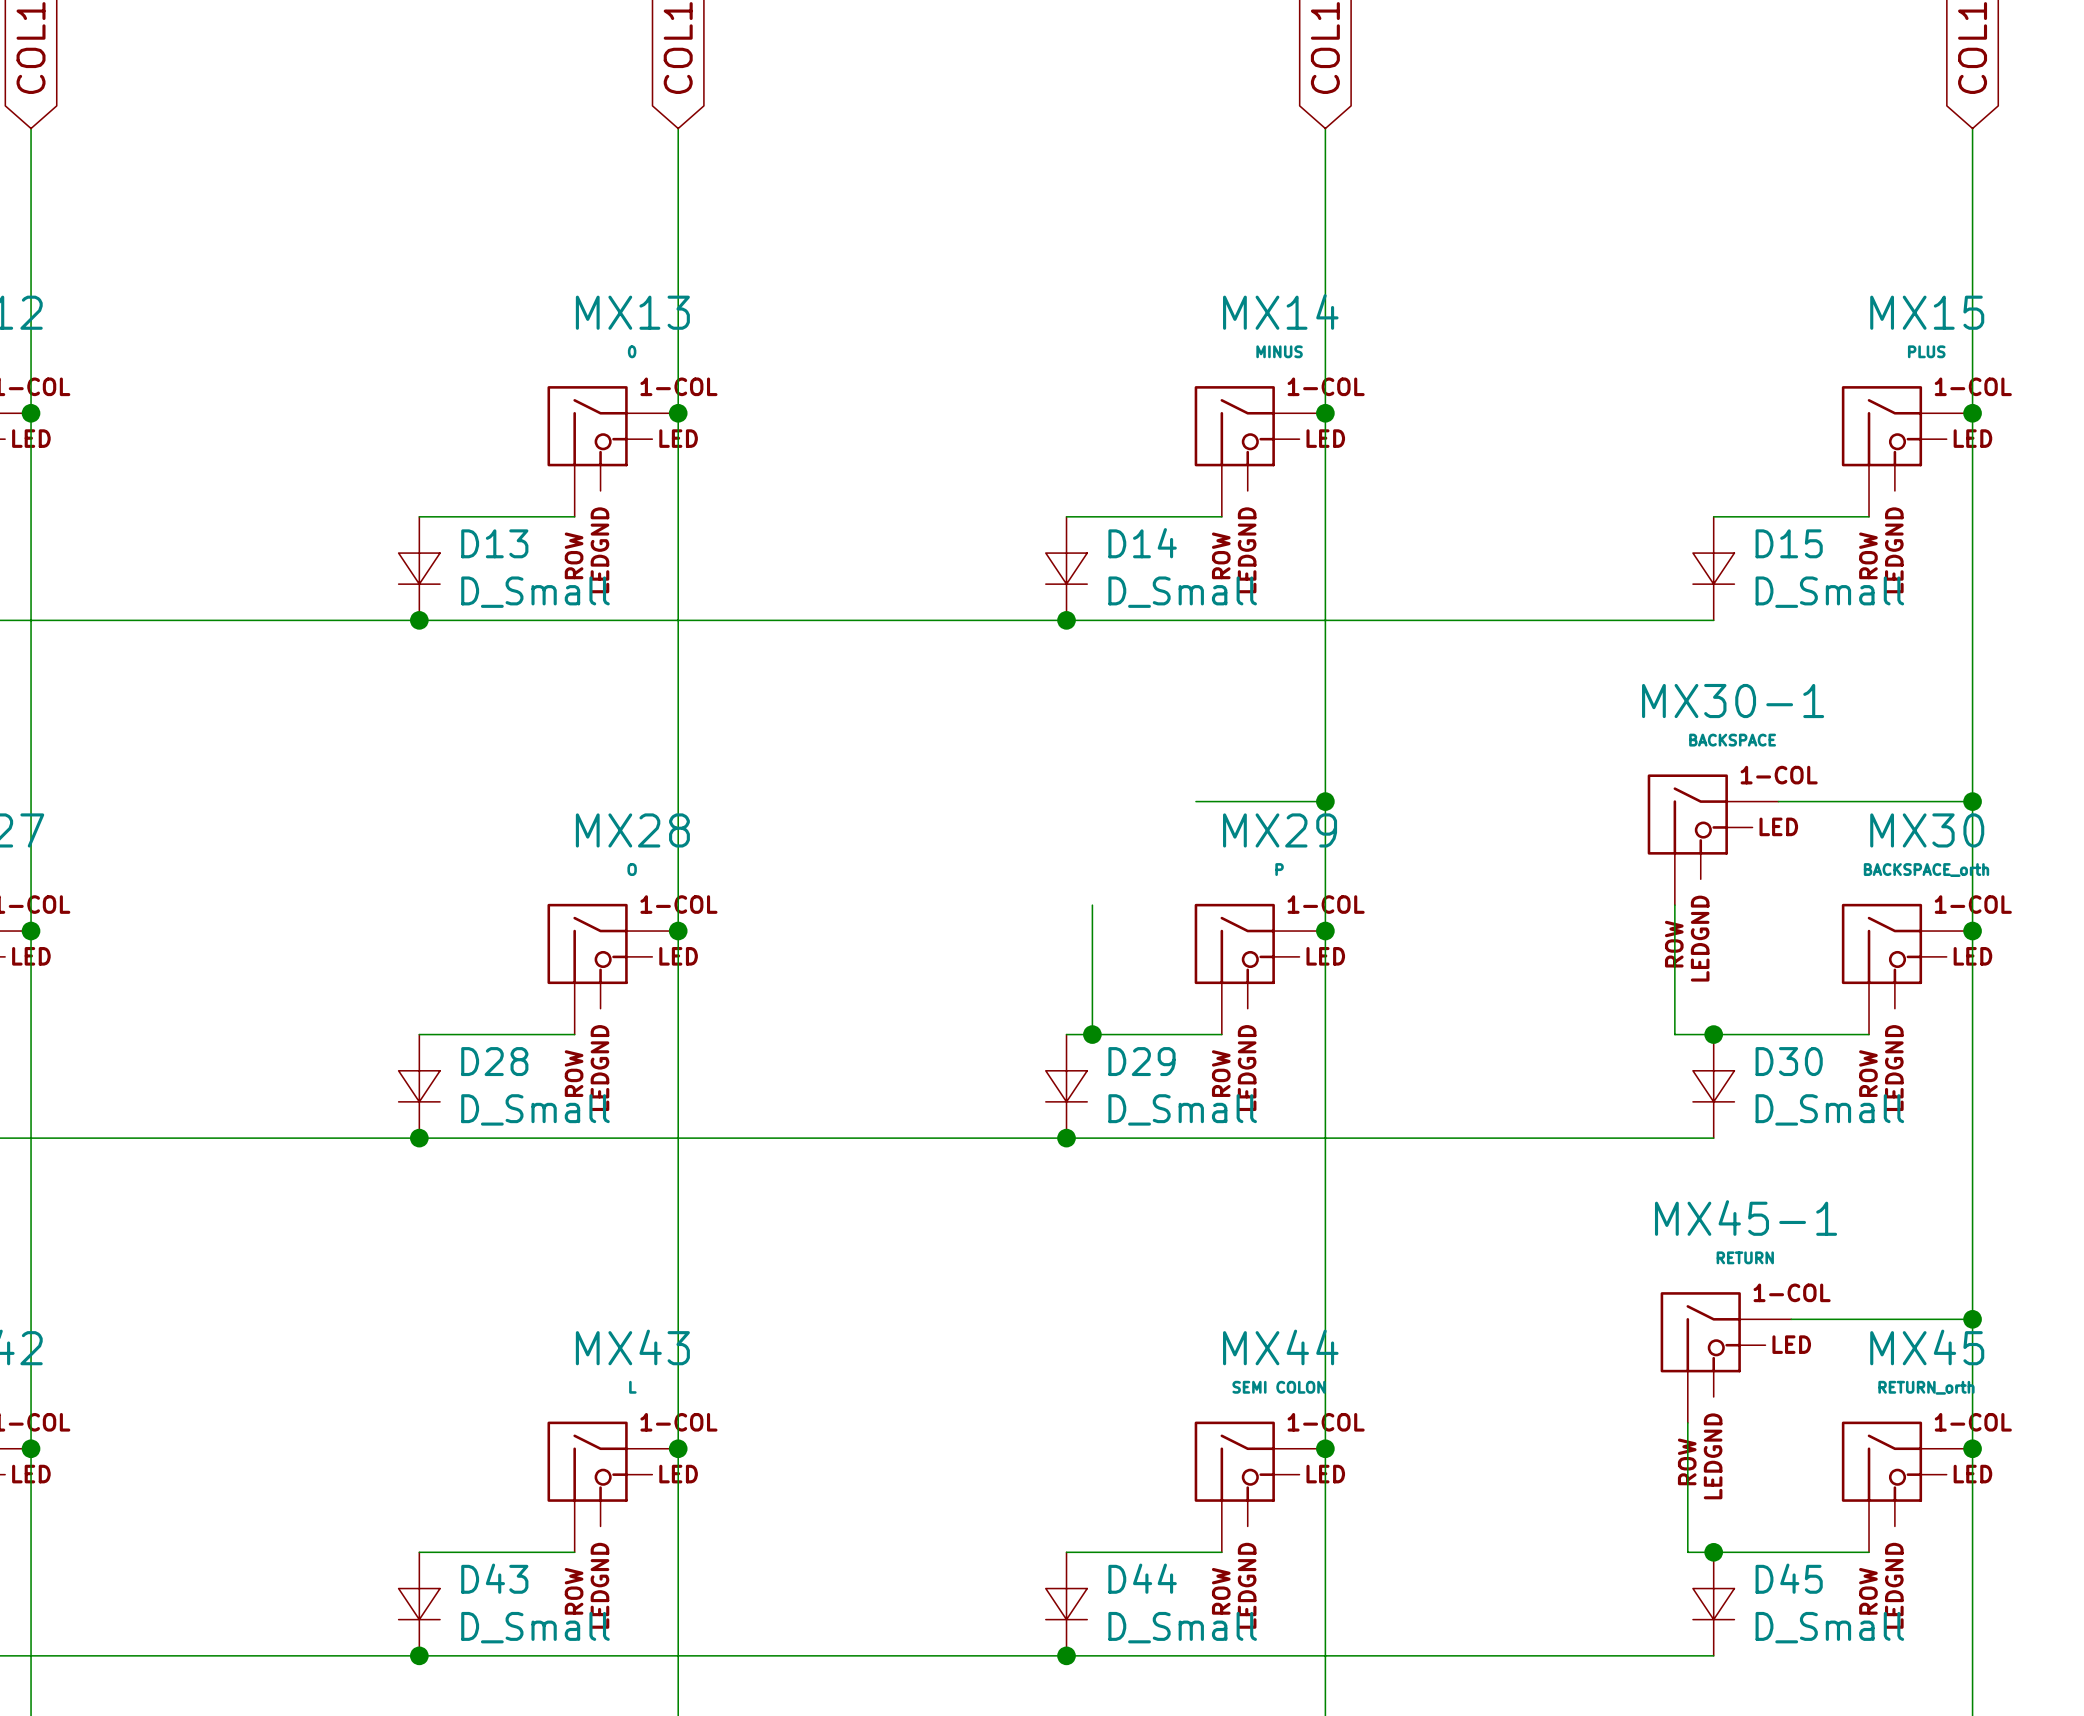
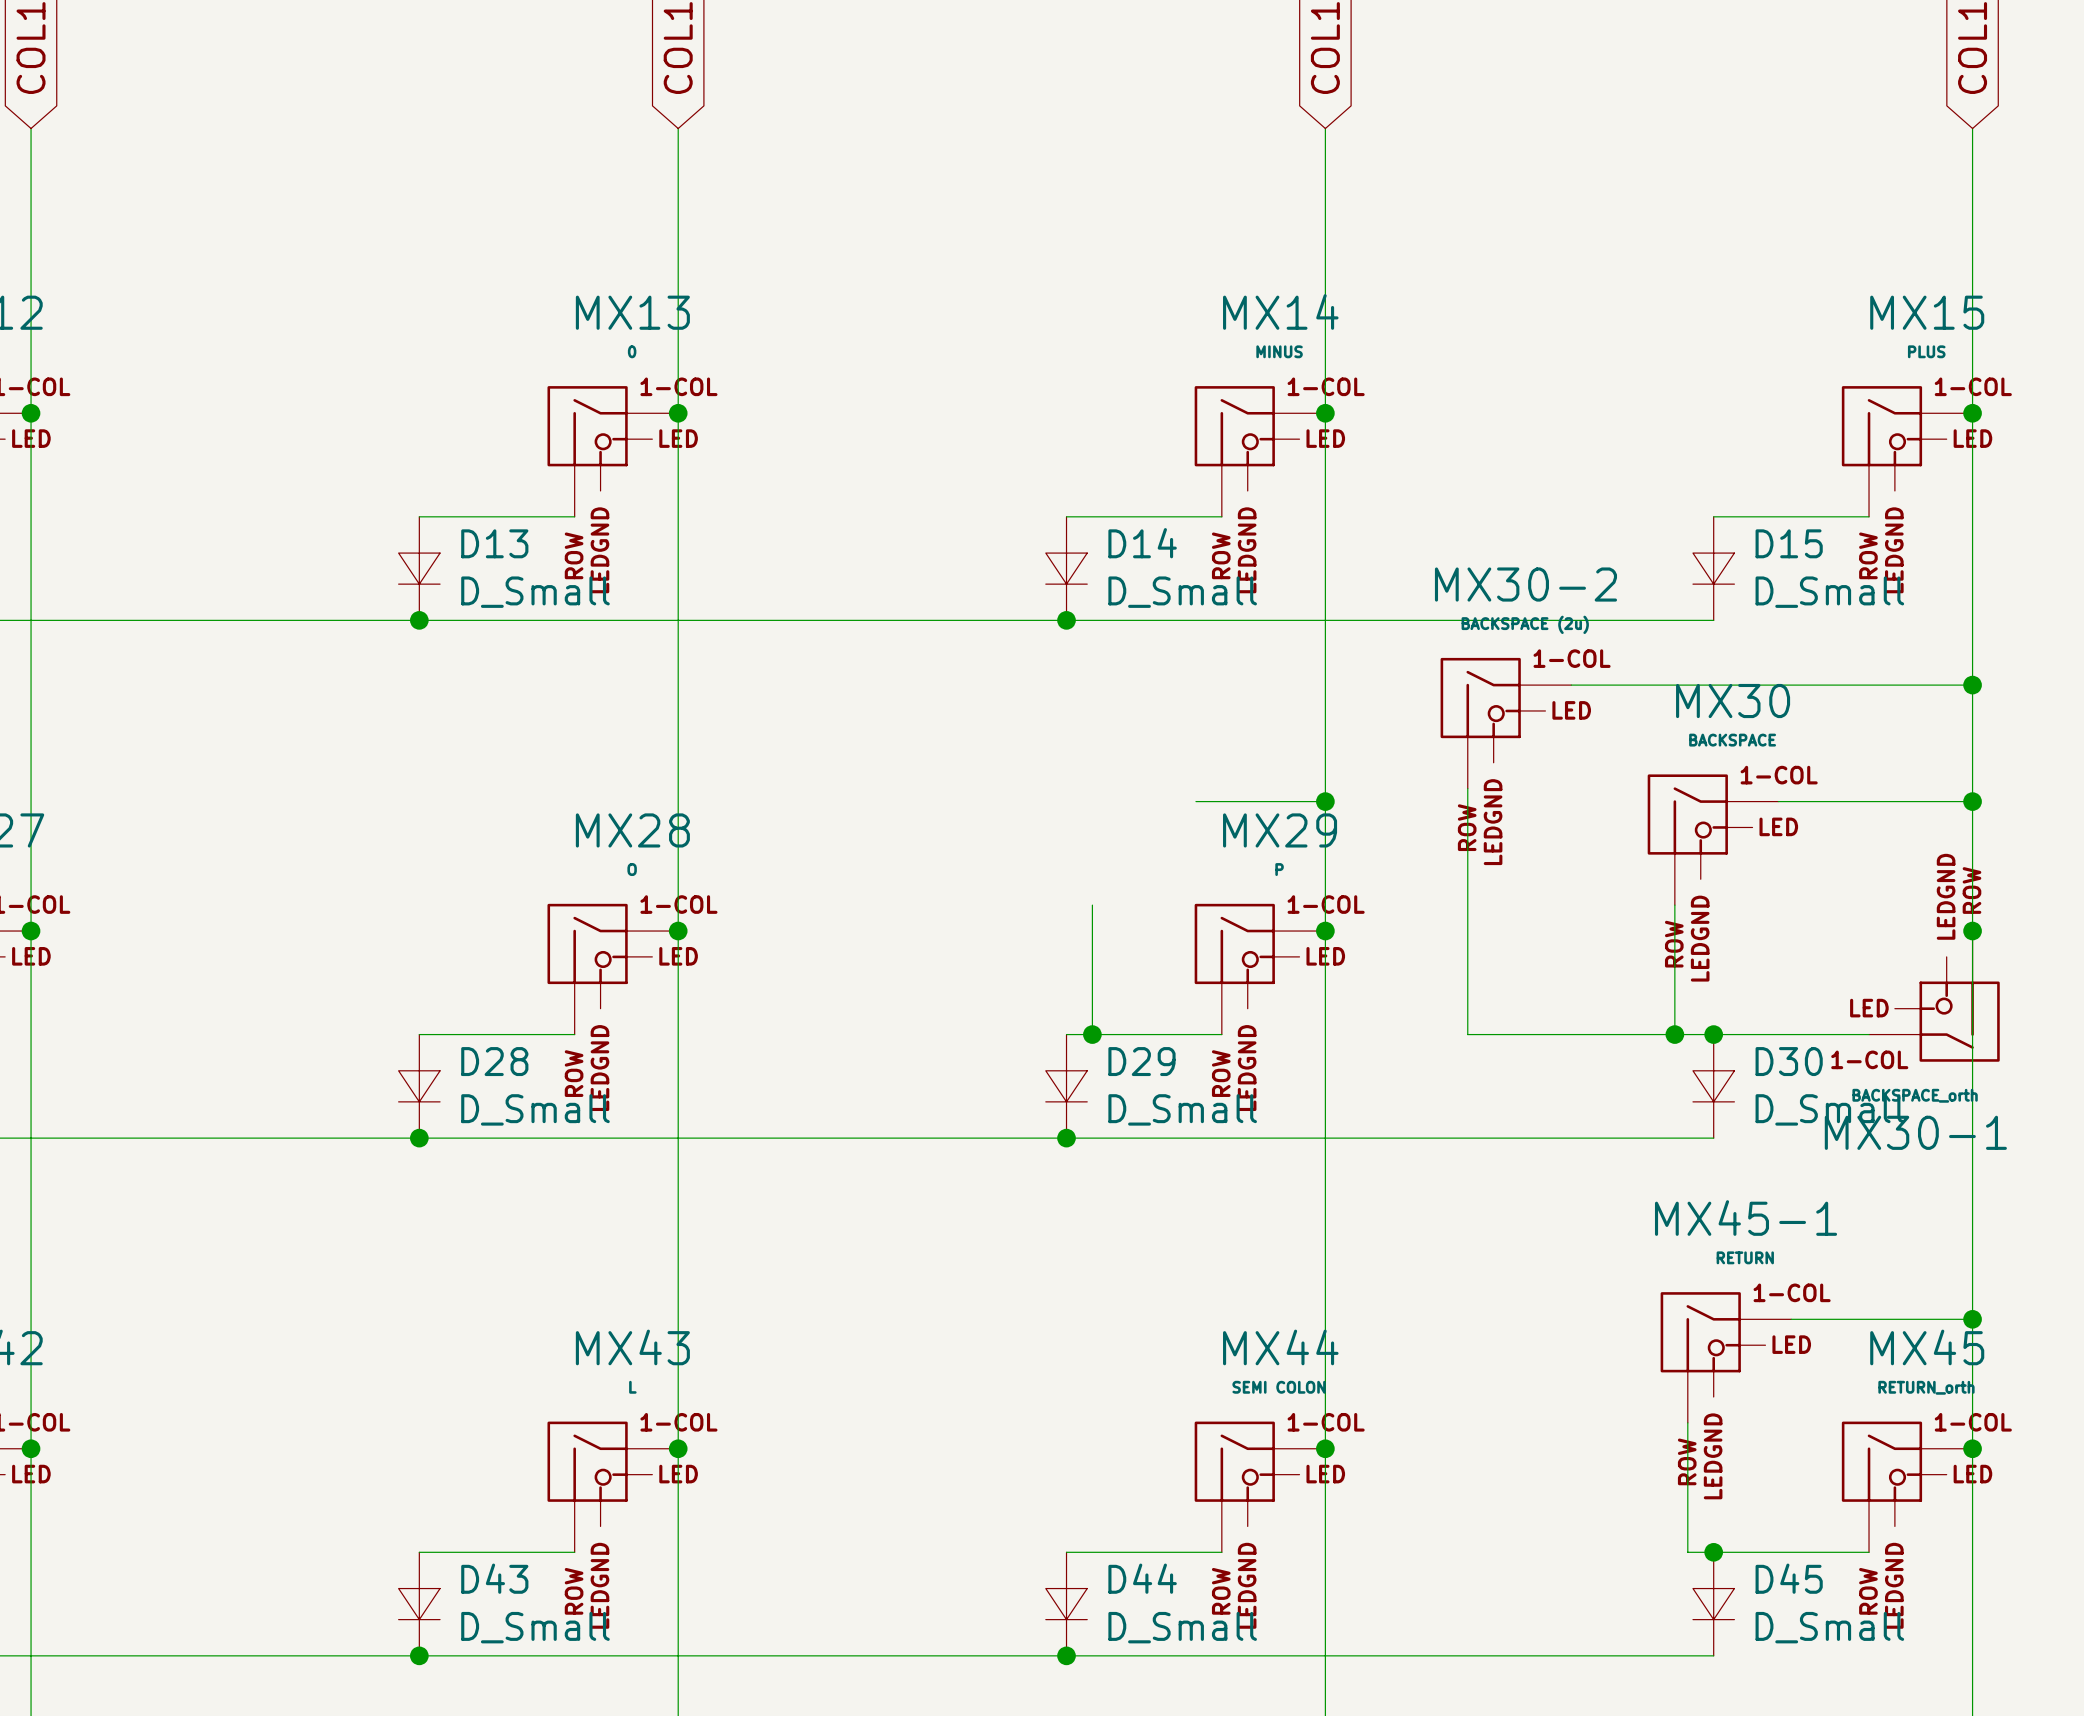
wire: none -> (1571, 685) (1972, 685)
junction: none -> (1972, 685)
MX30-1 name: MX30-1 (1733, 701) -> MX30 (1733, 701)
MX30-2: none -> BACKSPACE (2u) (1505, 723)
wire: none -> (1467, 788) (1467, 1034) (1674, 1034)
MX30: BACKSPACE_orth (1907, 969) -> none
MX30-1: none -> BACKSPACE_orth (1934, 996)
junction: none -> (1674, 1034)

